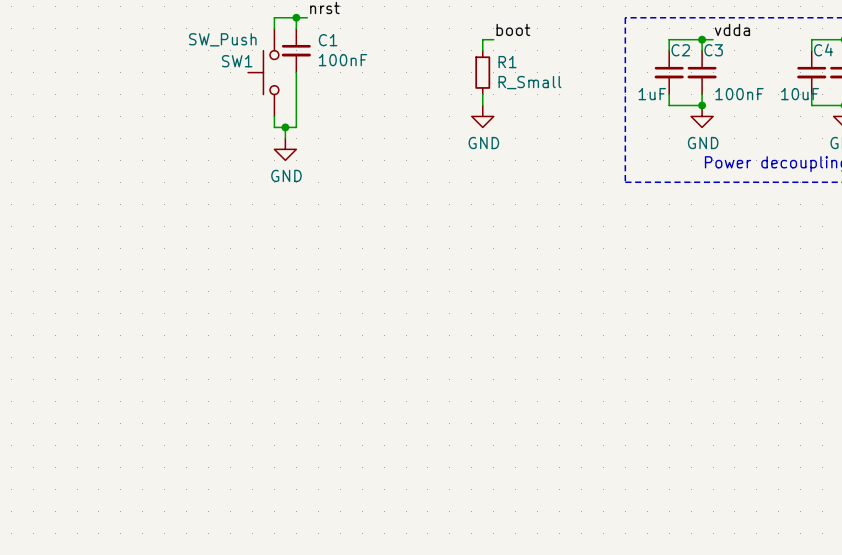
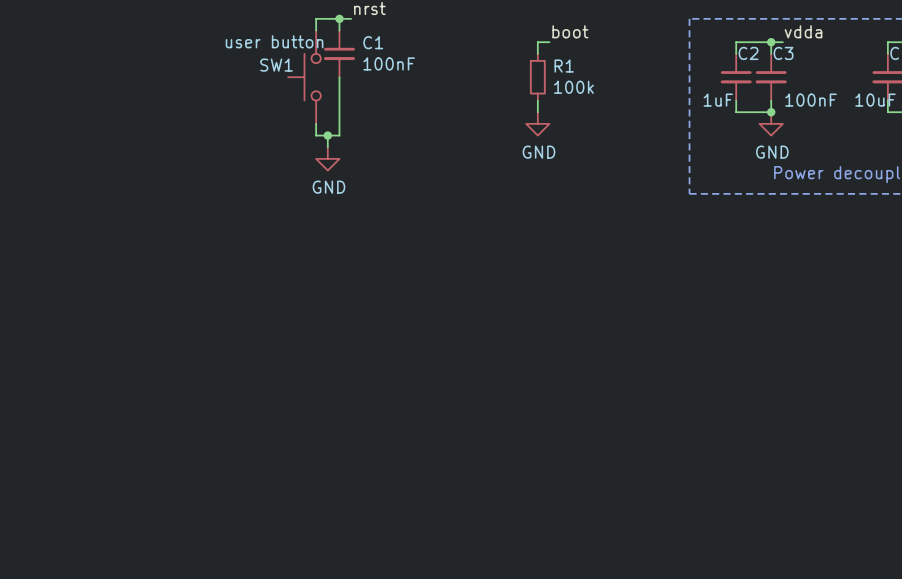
SW1 value: SW_Push (222, 39) -> user button (274, 41)
R1 value: R_Small (529, 82) -> 100k (573, 87)

